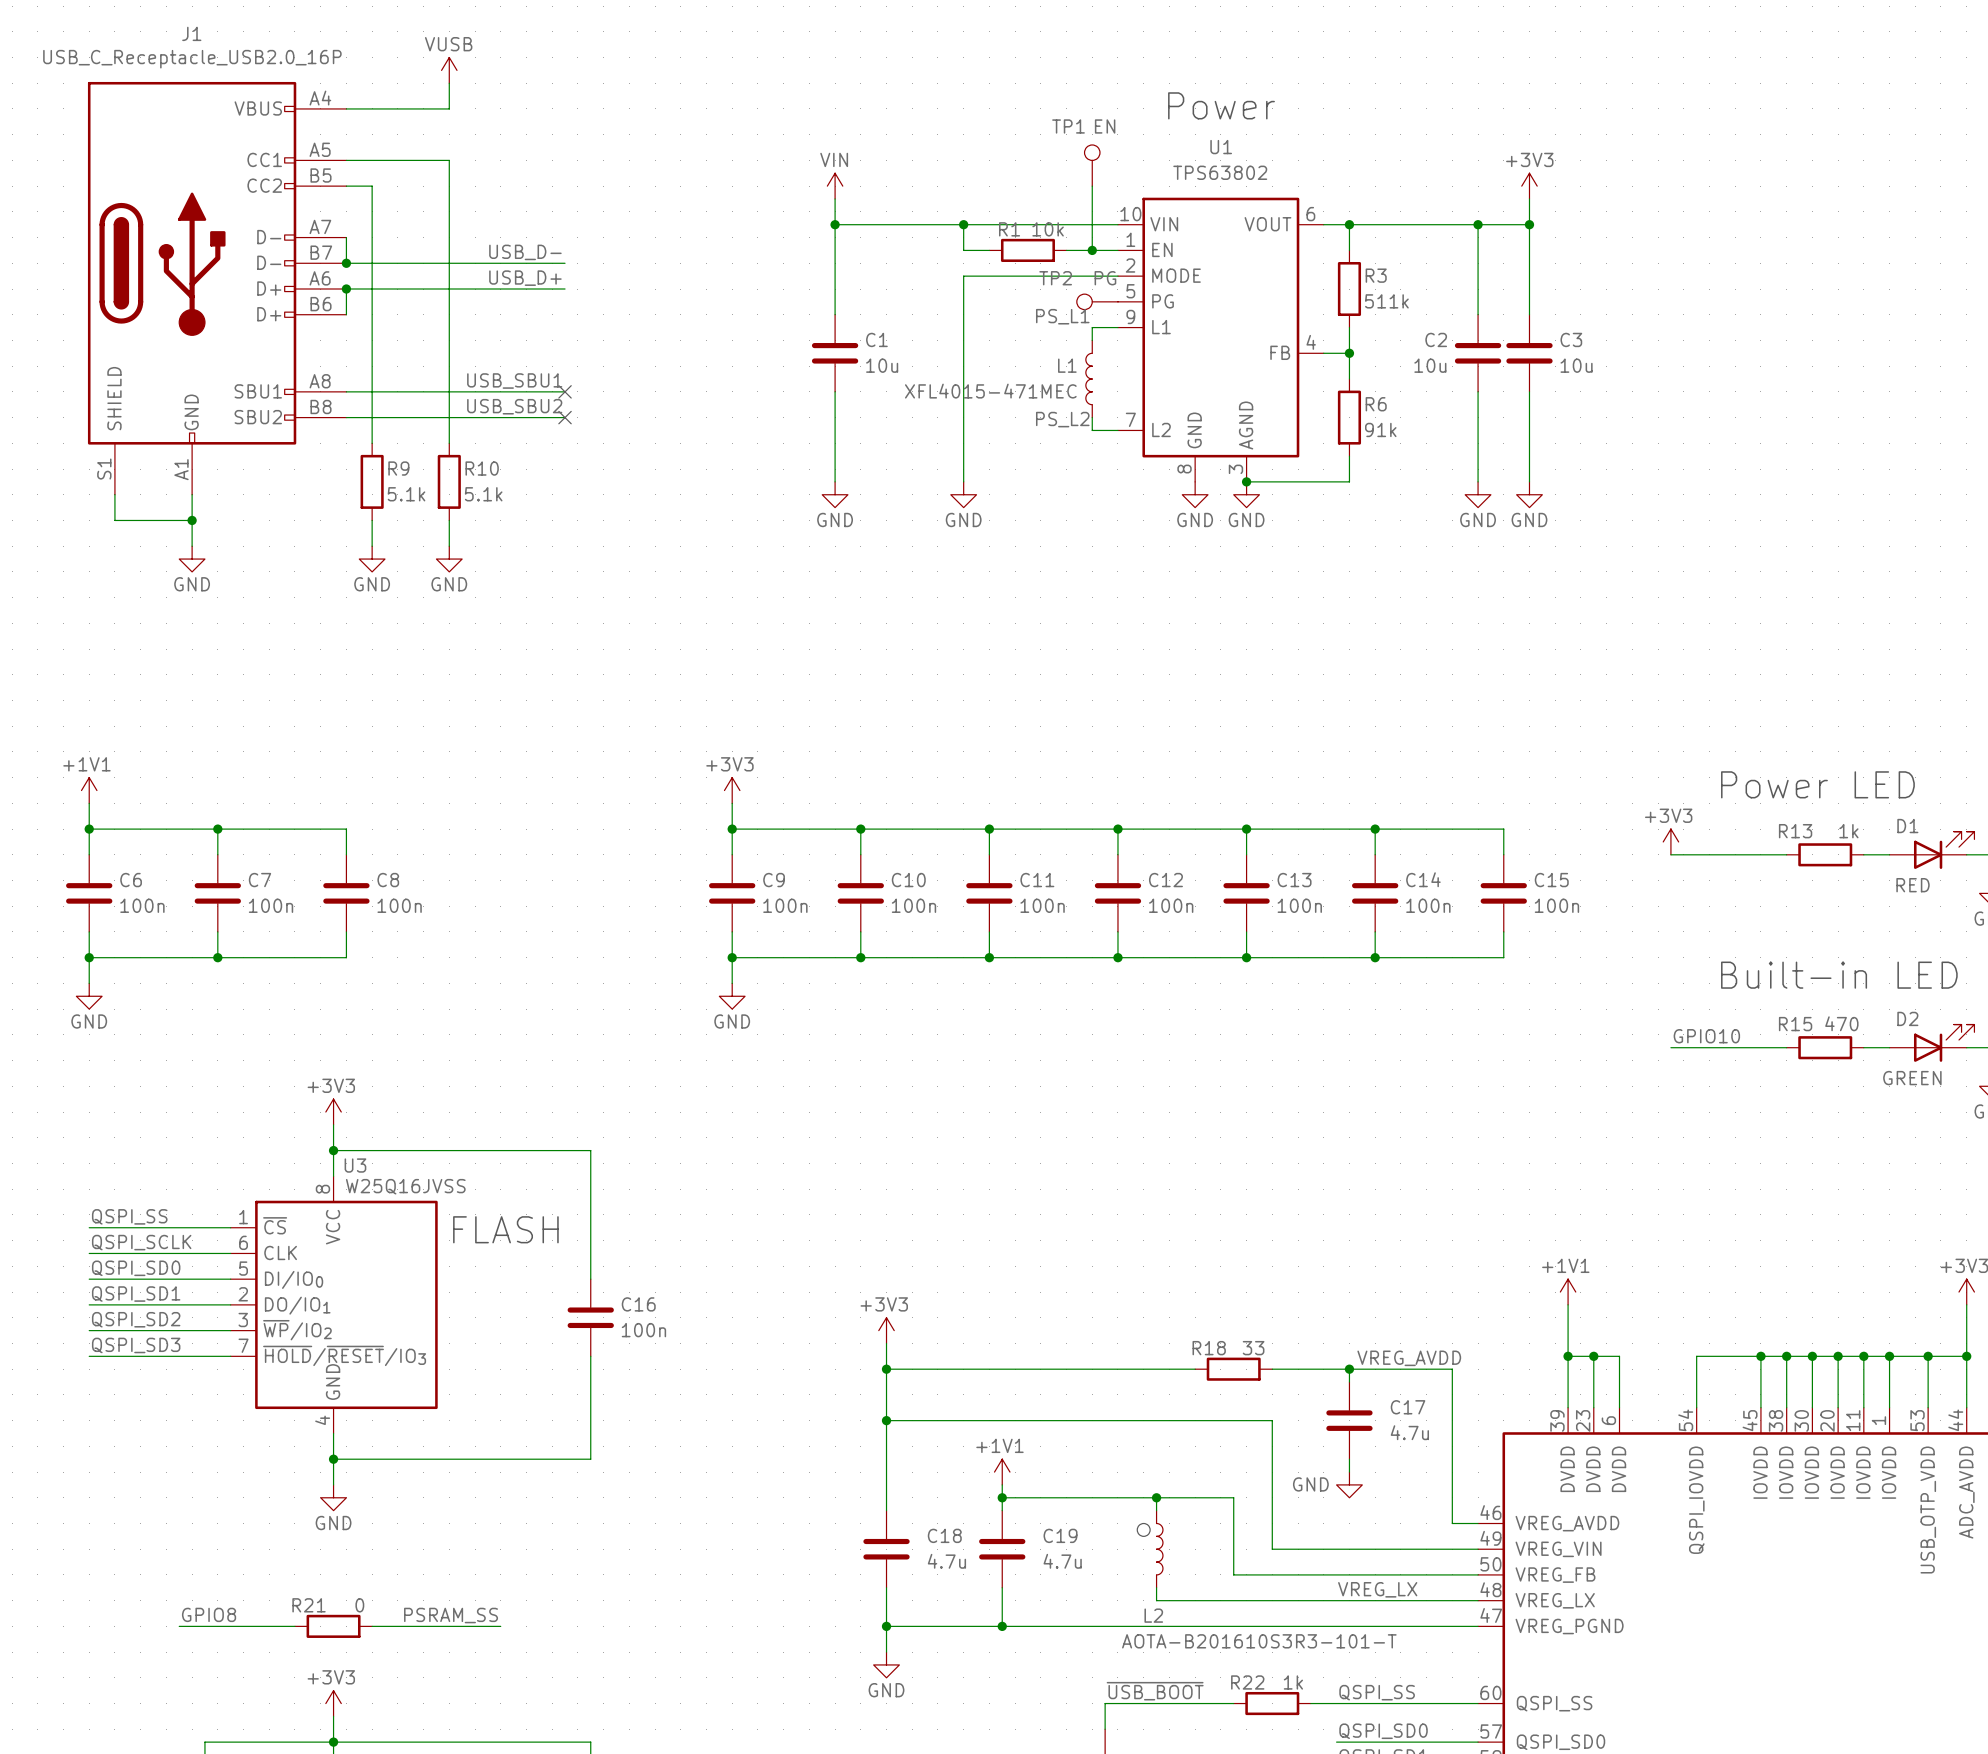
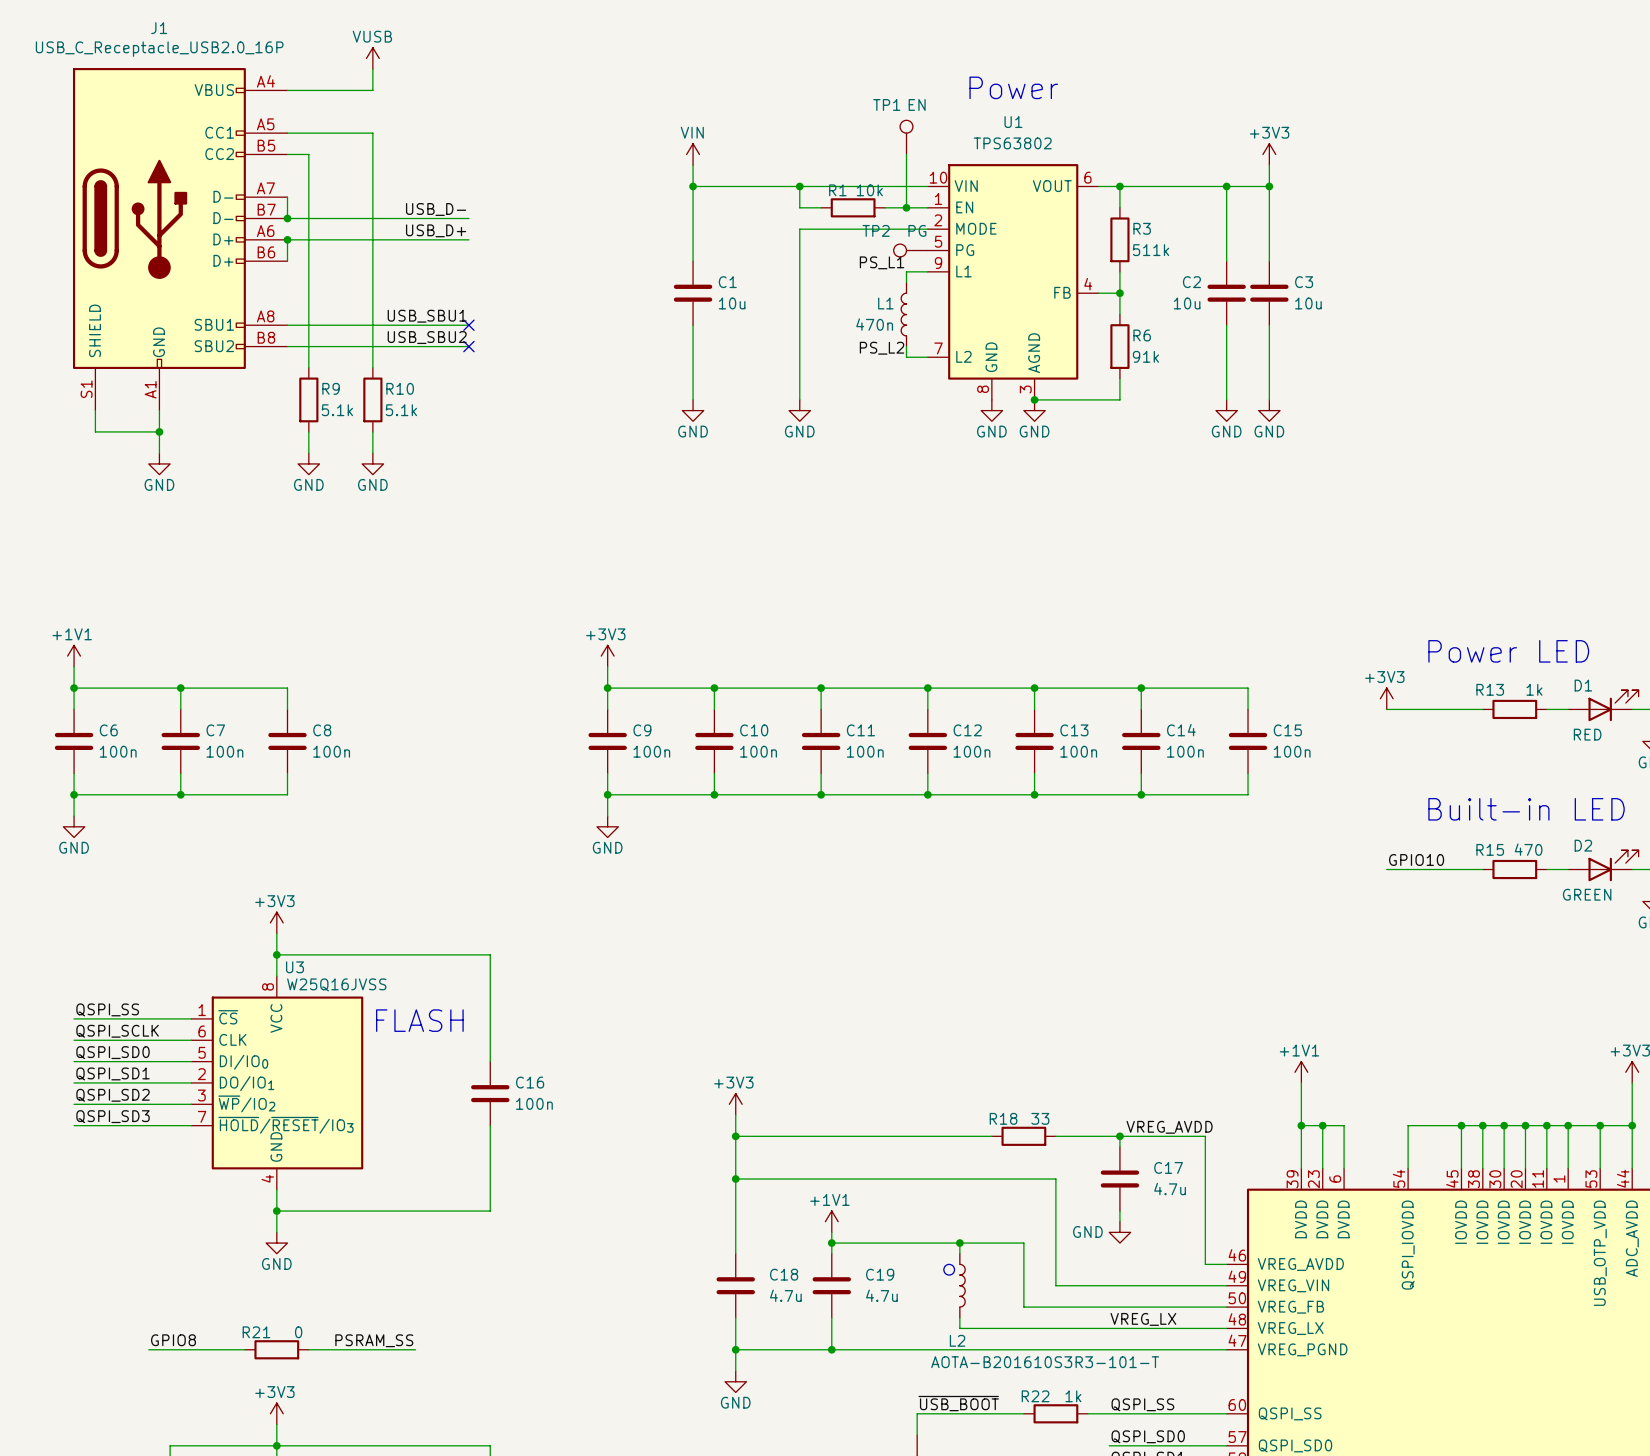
L1 value: XFL4015-471MEC (990, 391) -> 470n (874, 324)

